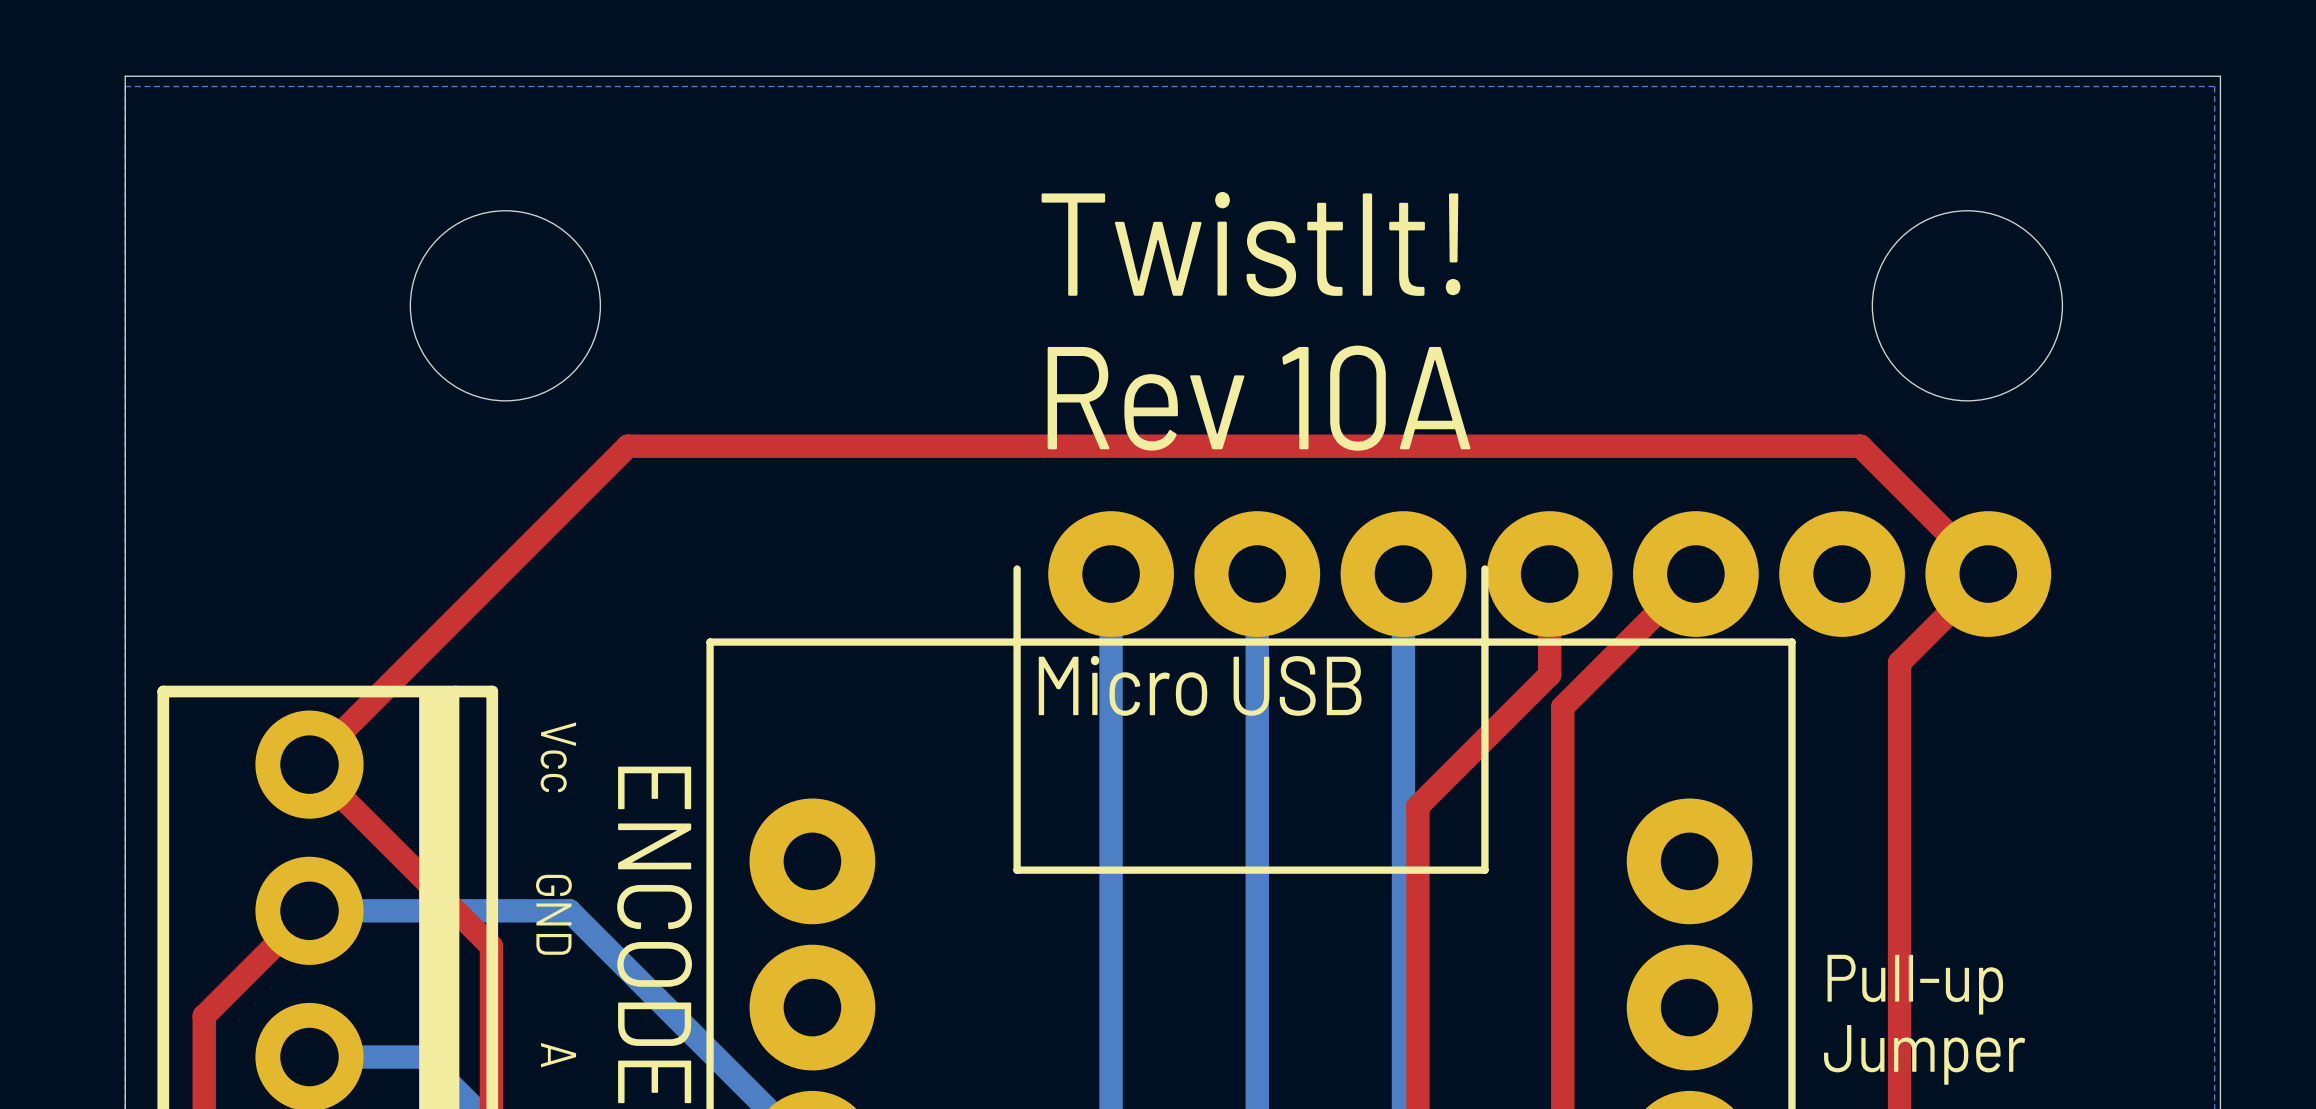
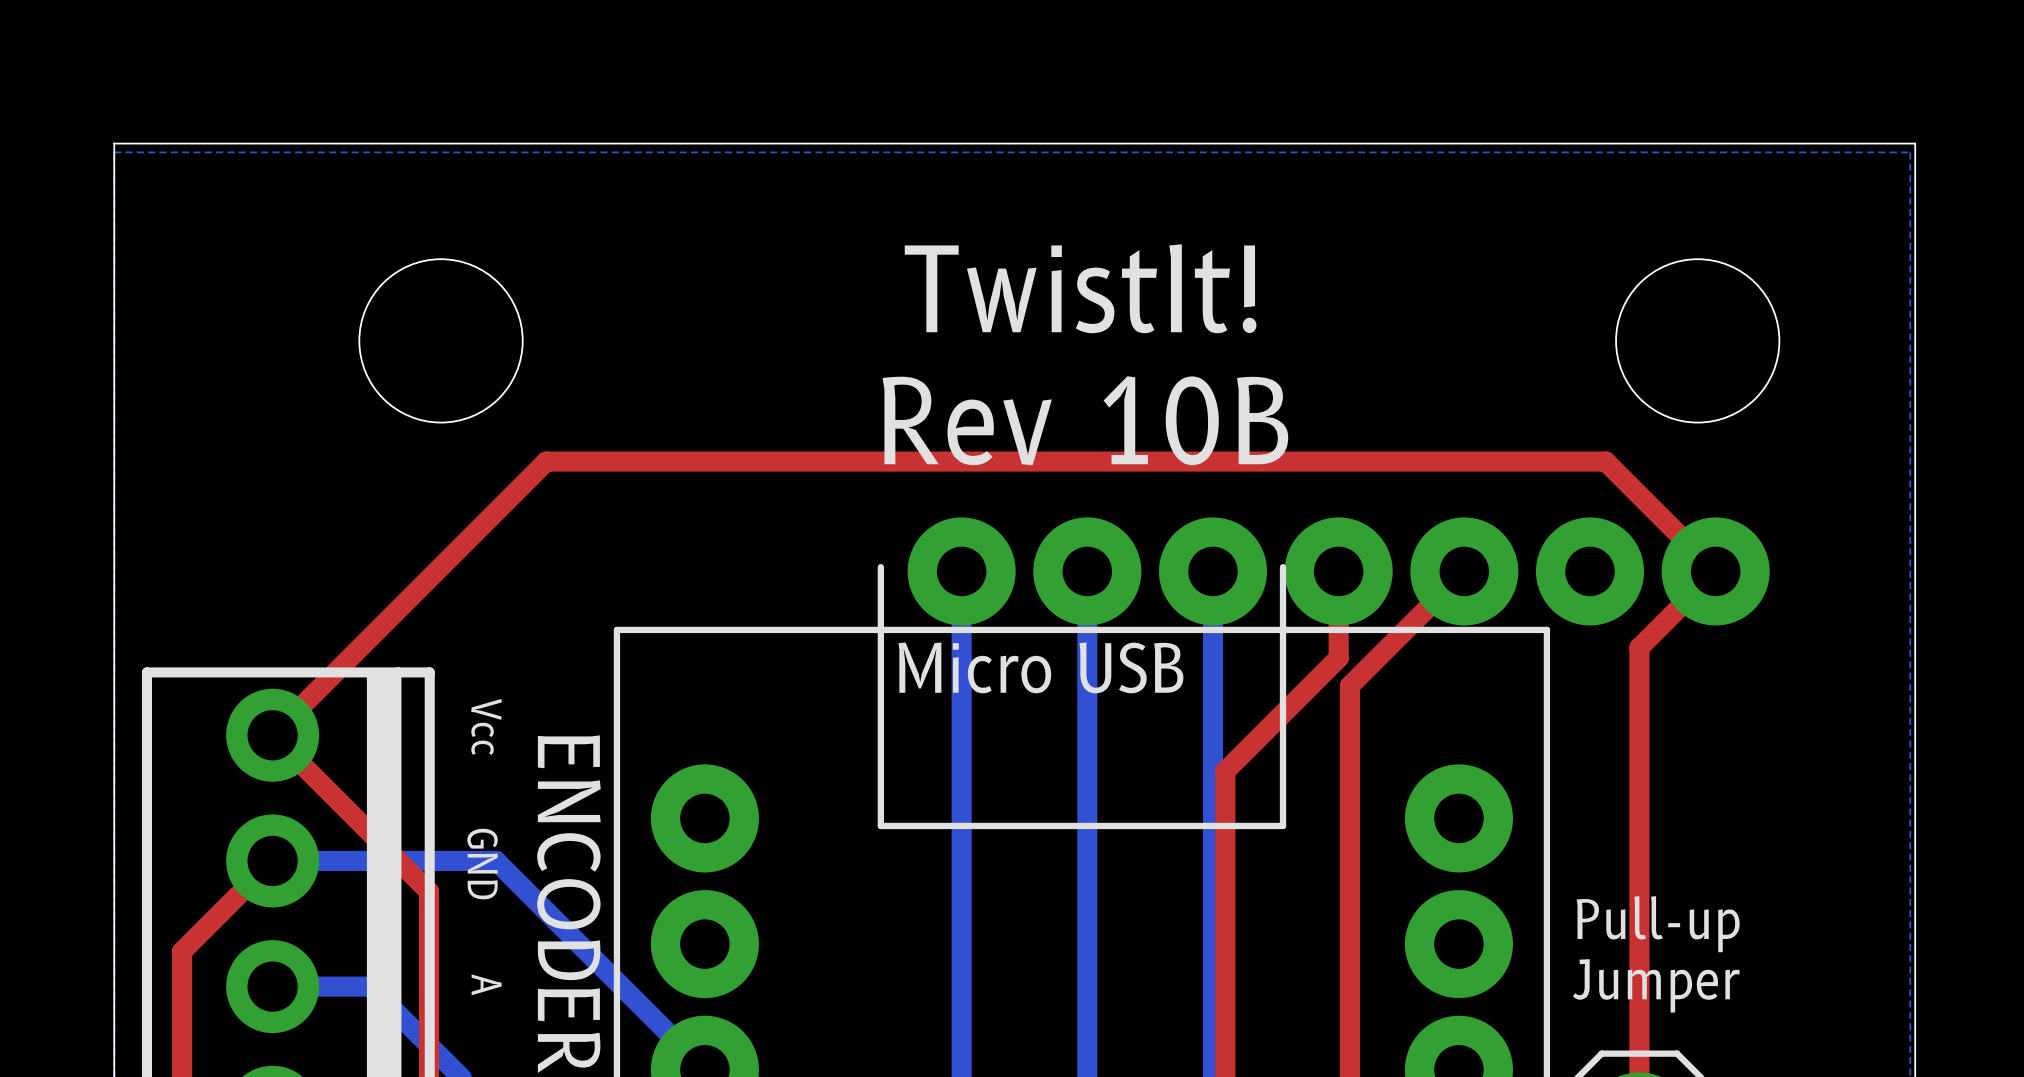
text: Rev 10A (1259, 398) -> Rev 10B (1085, 420)

